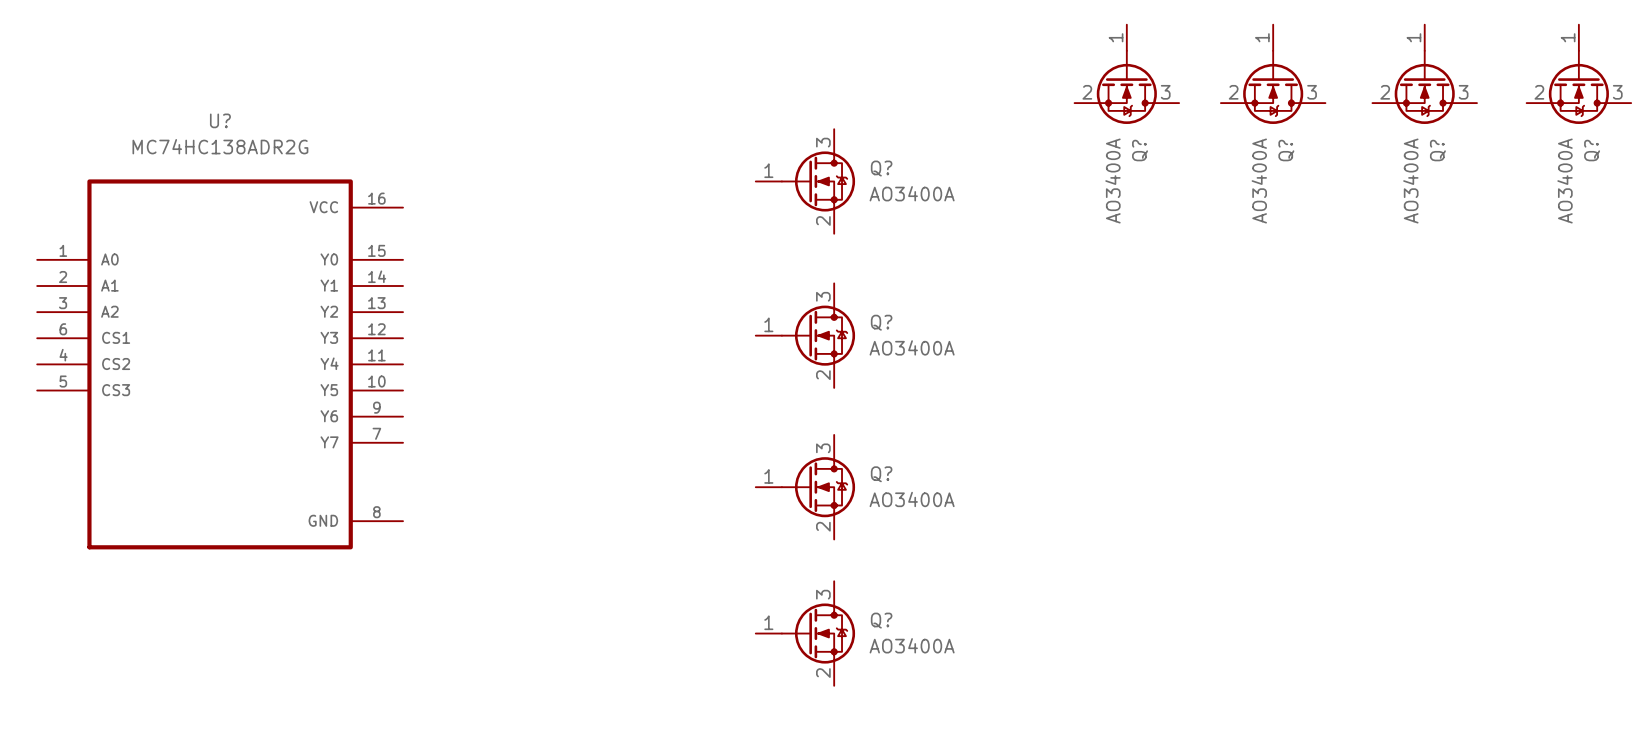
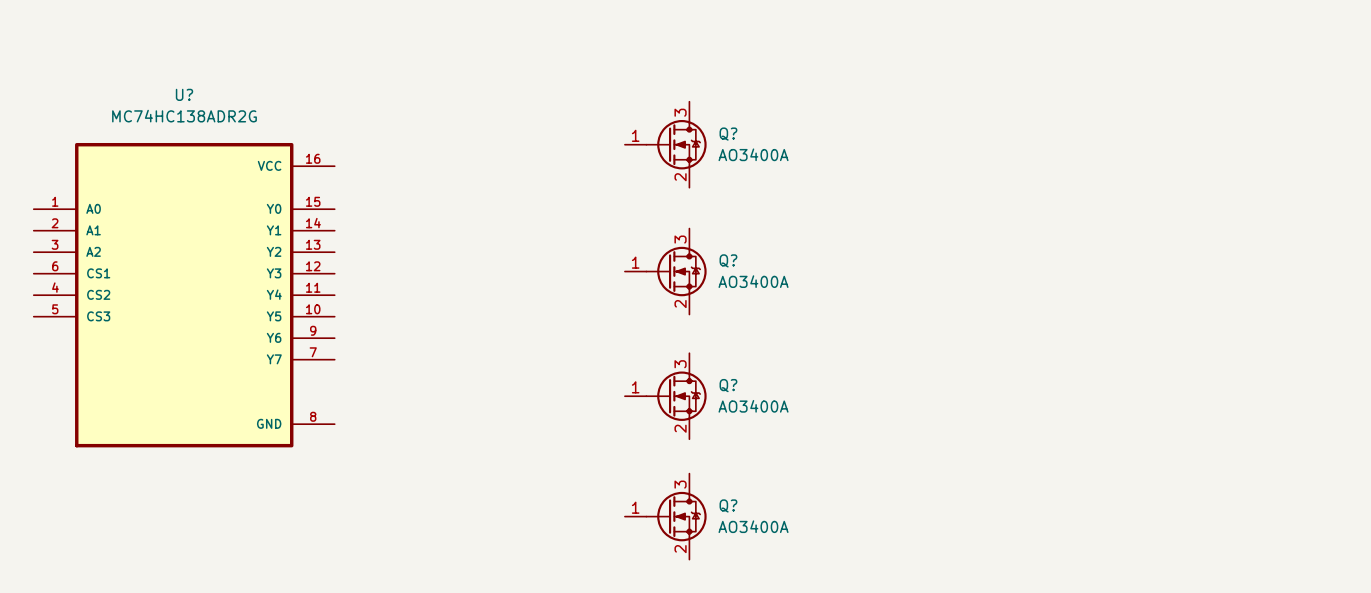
Q?: AO3400A (1126, 74) -> none
Q?: AO3400A (1273, 74) -> none
Q?: AO3400A (1424, 74) -> none
Q?: AO3400A (1578, 74) -> none

